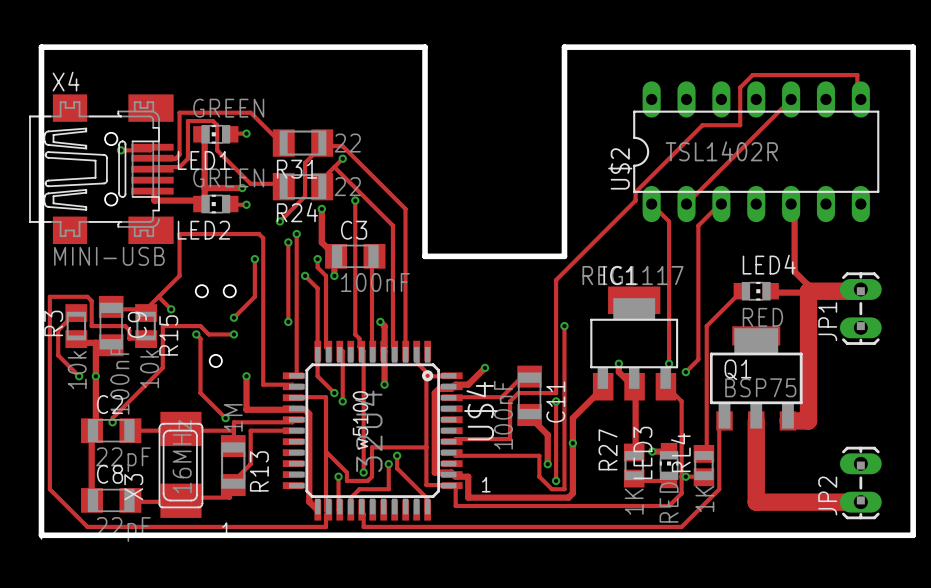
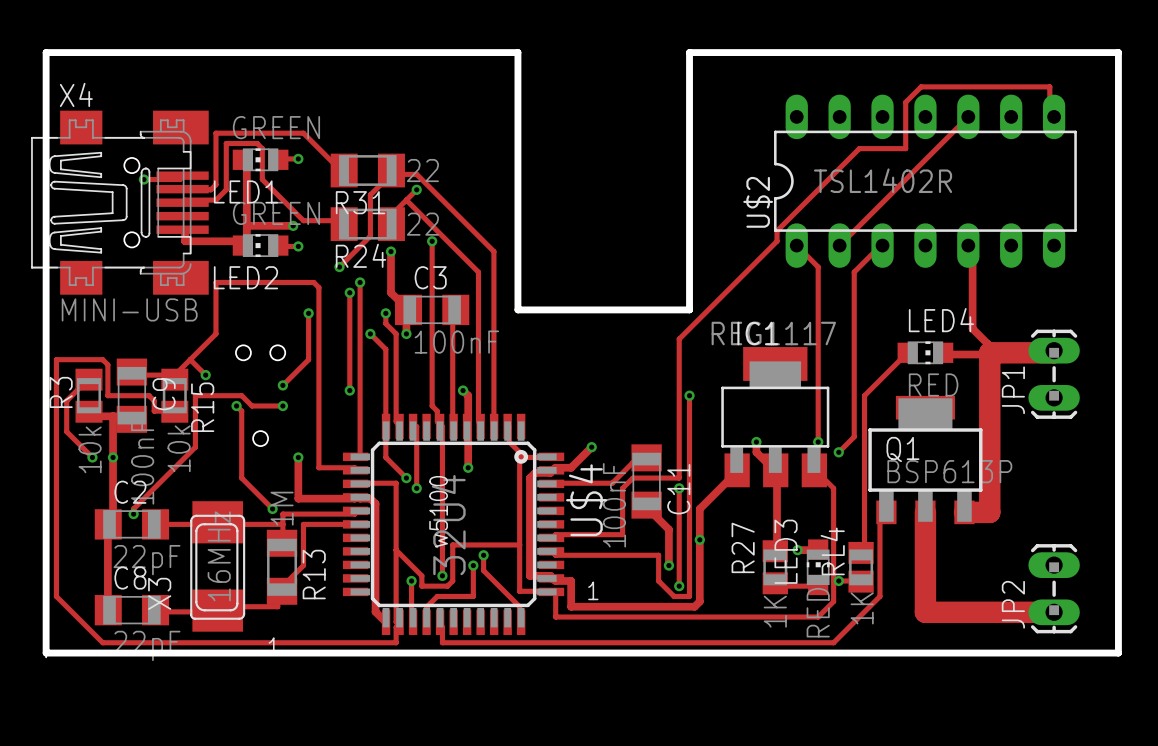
Q1 value: BSP75 (760, 387) -> BSP613P (949, 471)

